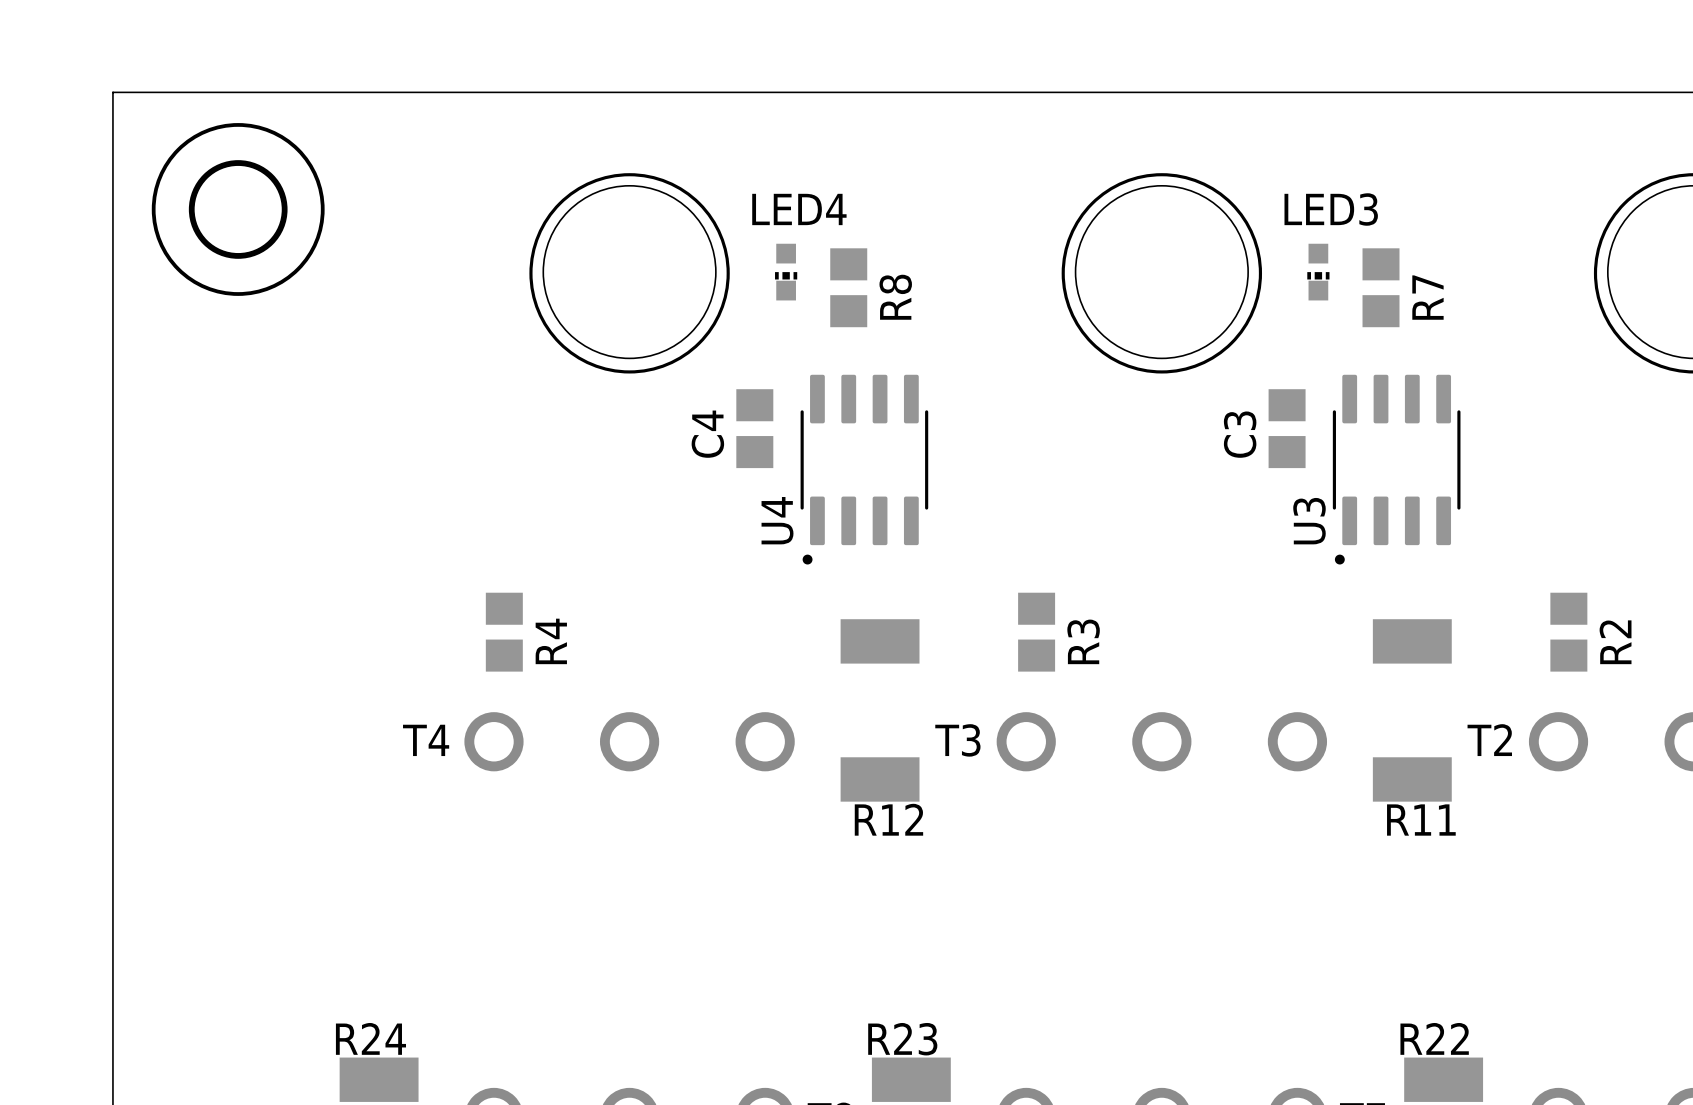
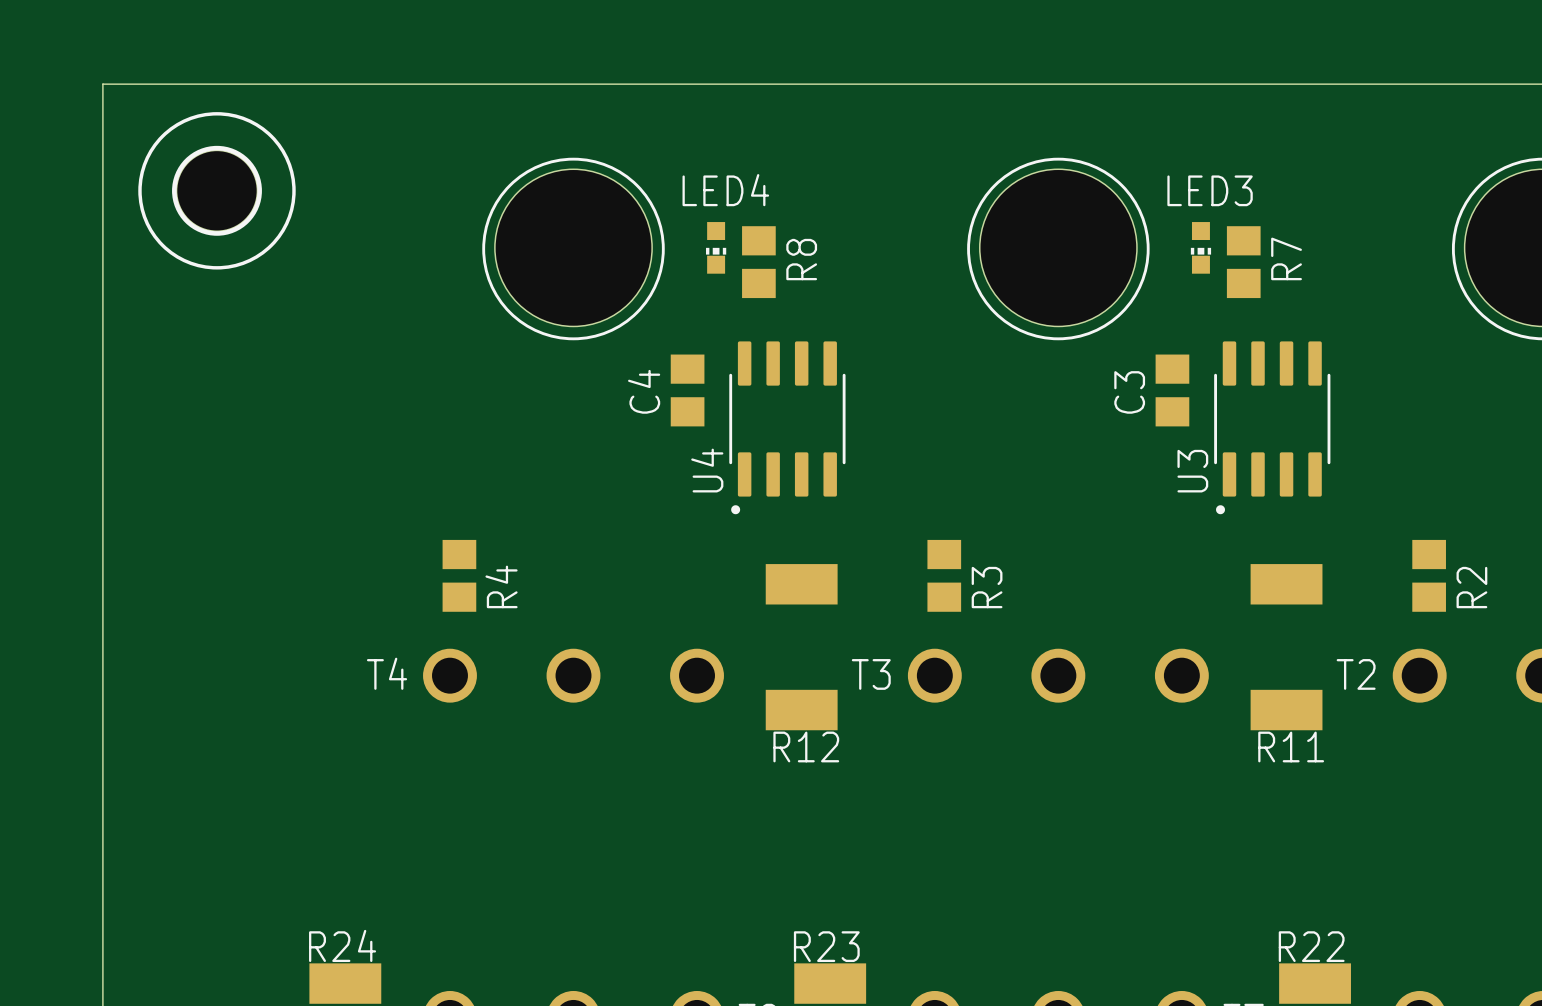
R8 position: (848, 287) -> (758, 262)
R7 position: (1381, 287) -> (1243, 262)
R8 name position: R8 (895, 297) -> R8 (801, 259)
R7 name position: R7 (1427, 297) -> R7 (1286, 258)

